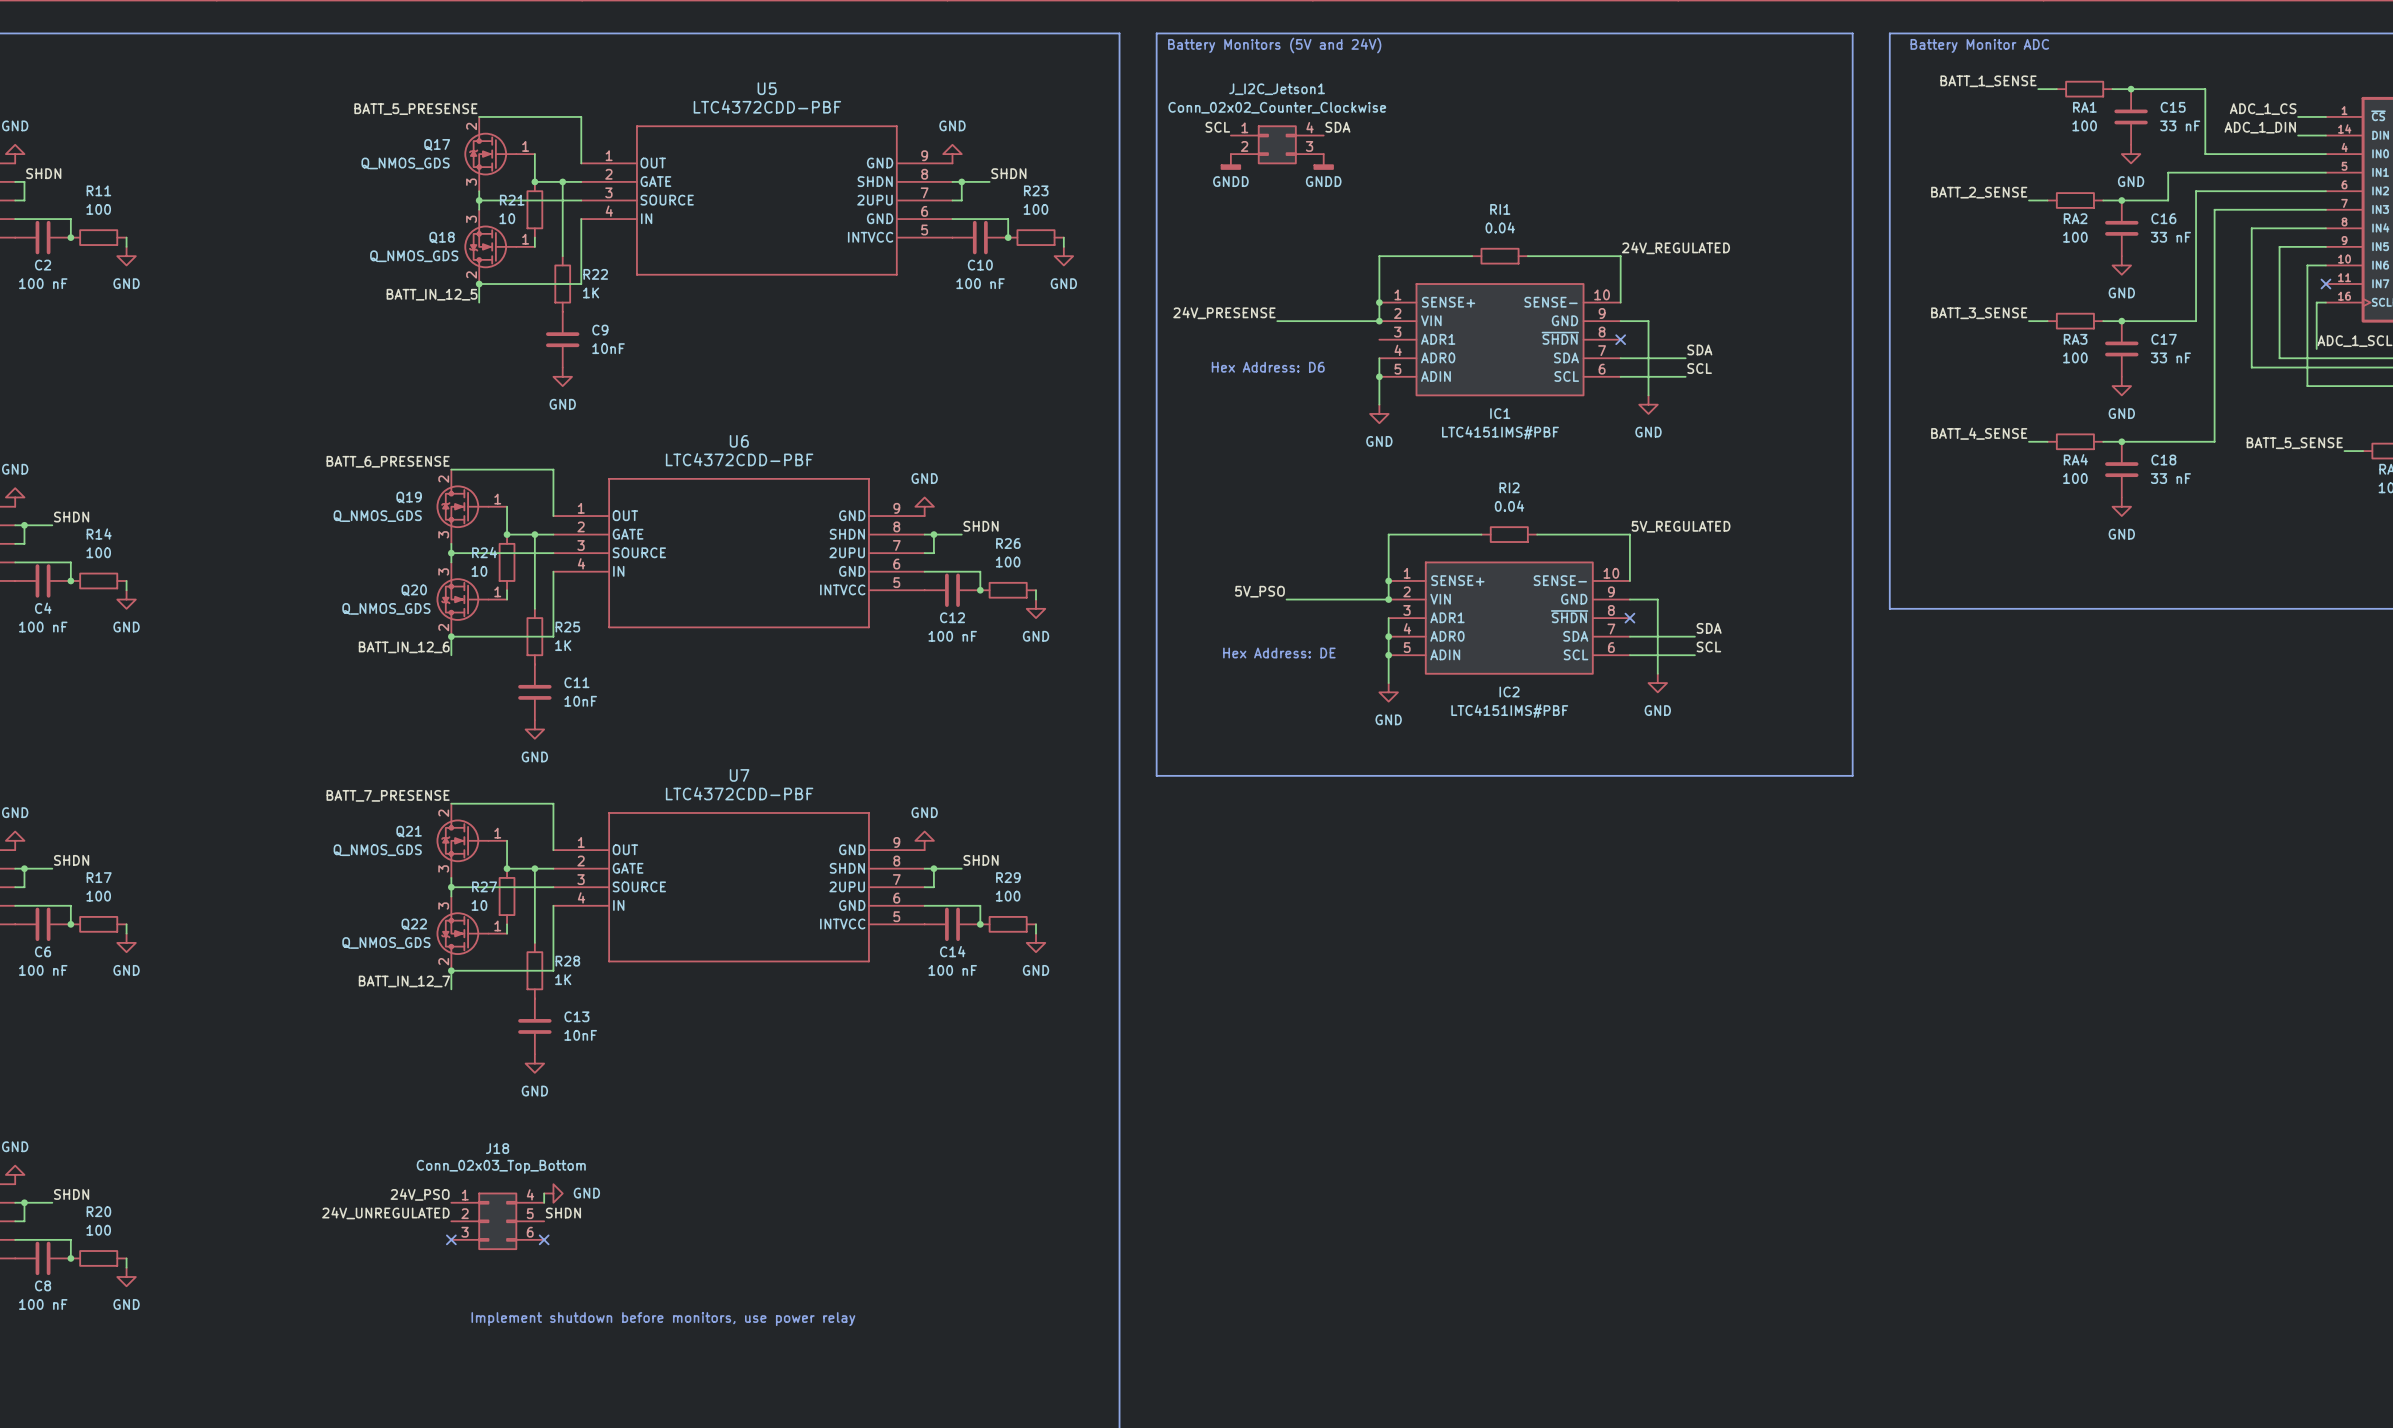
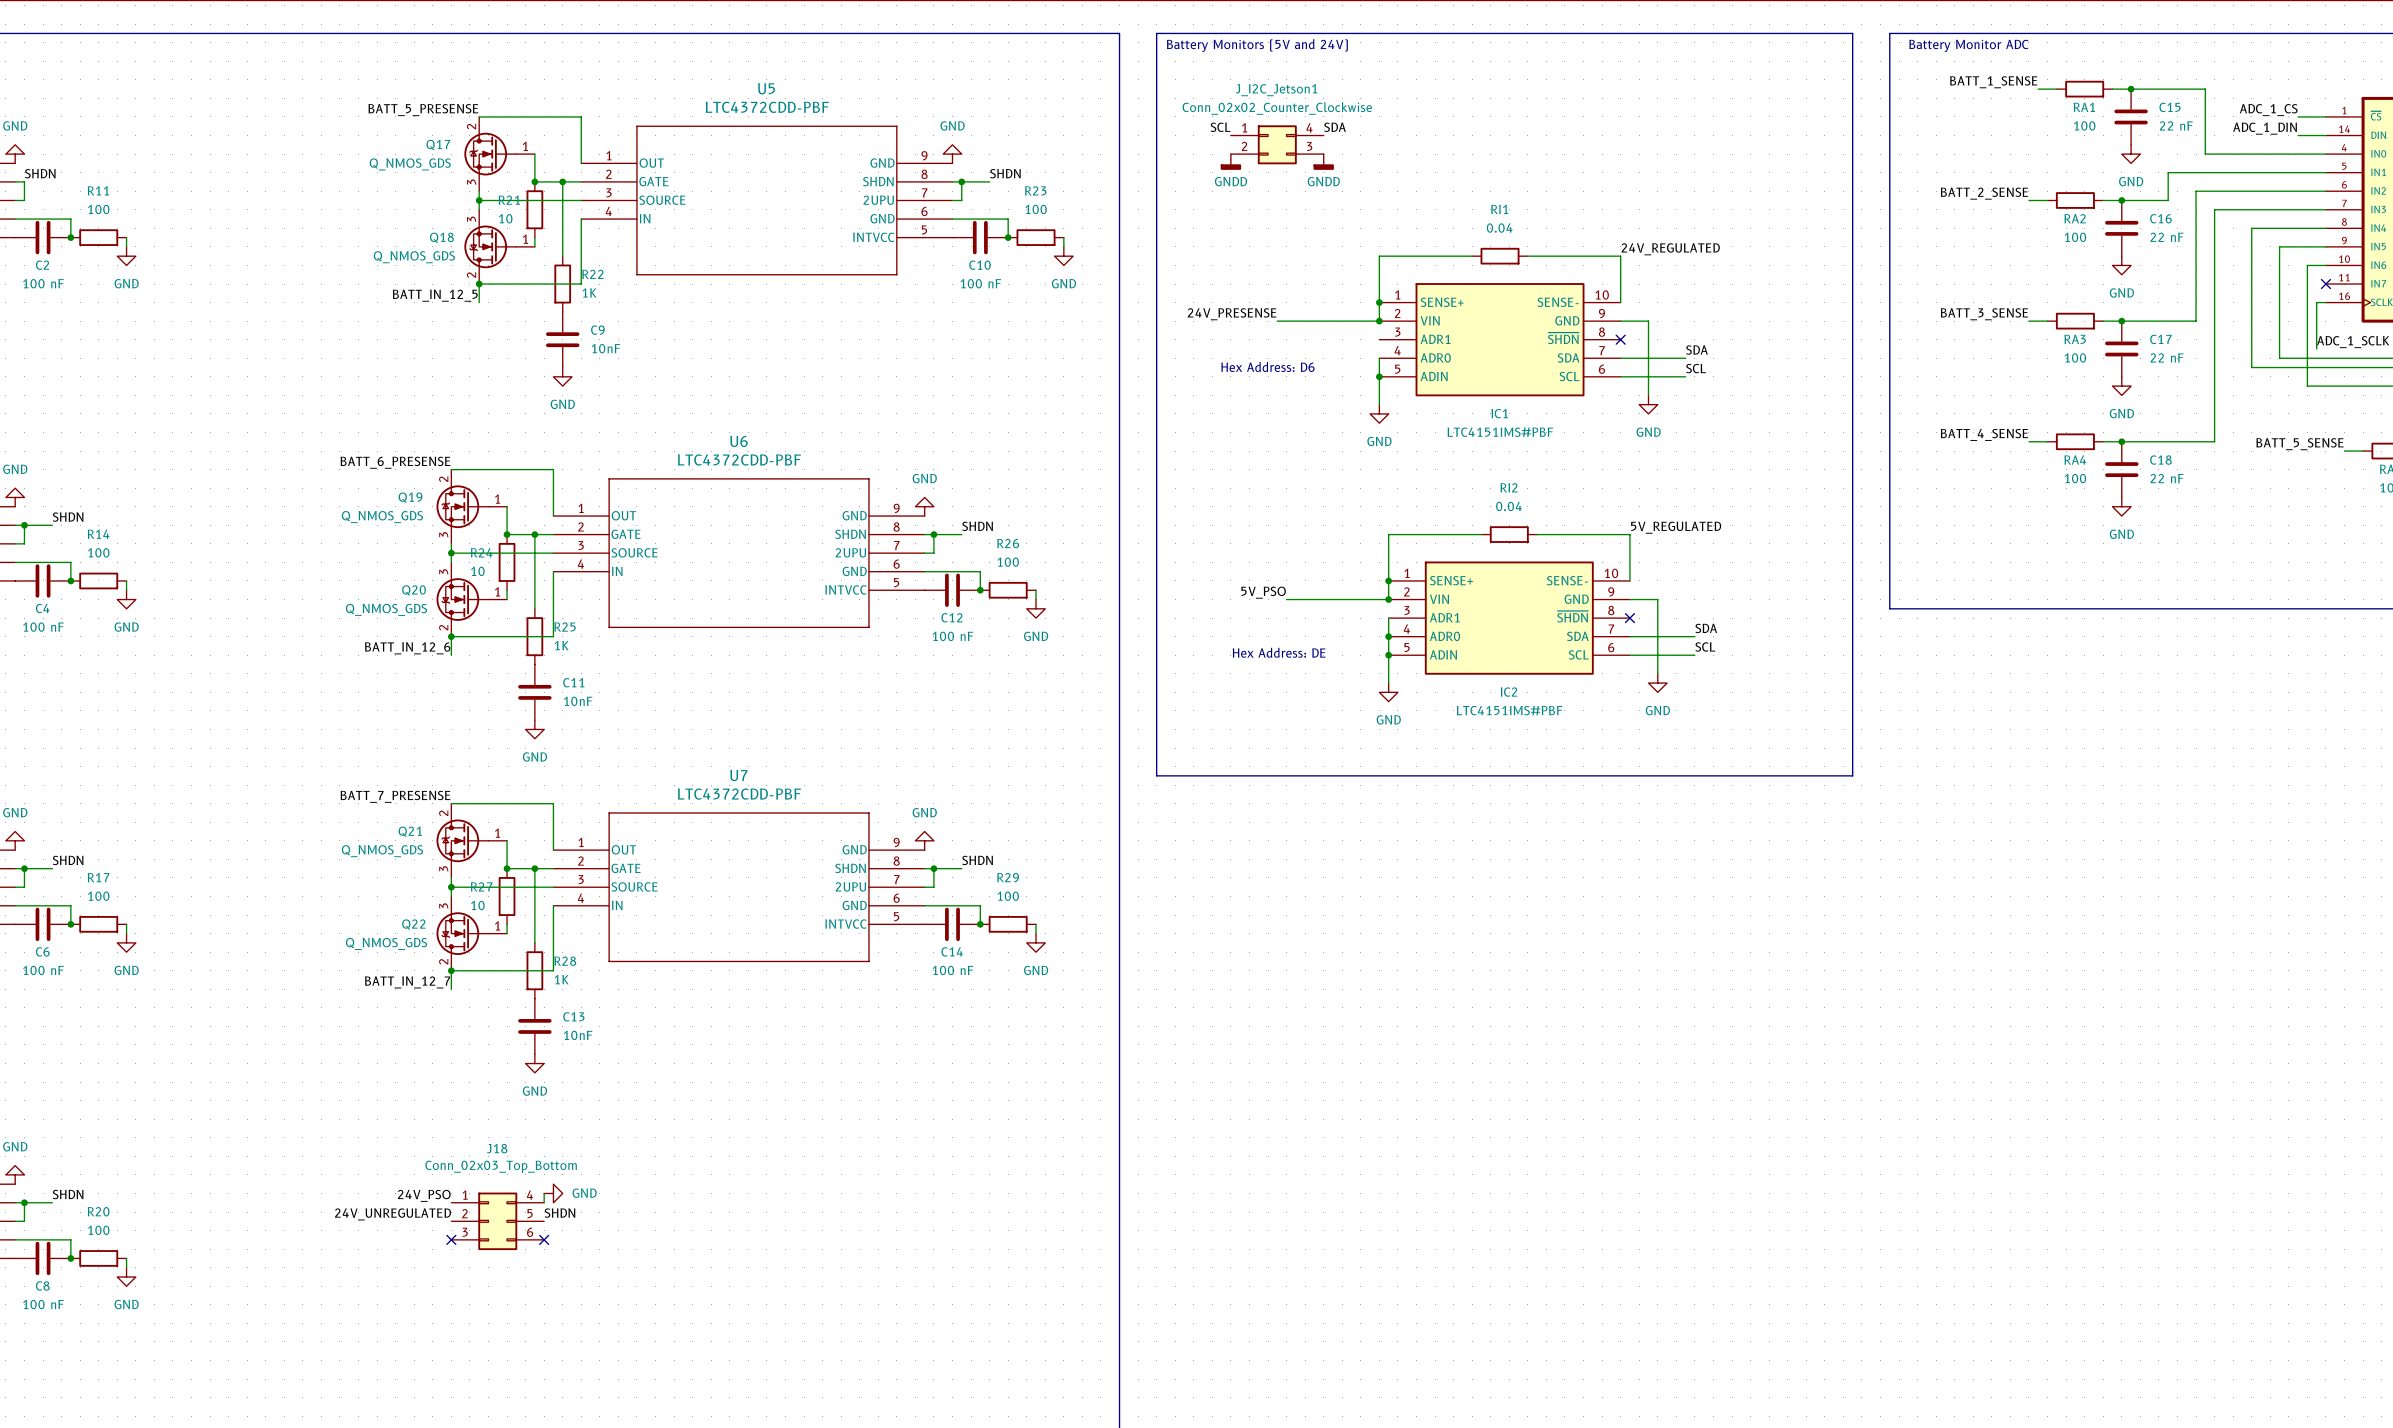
C15 value: 33 nF (2180, 125) -> 22 nF (2176, 125)
C16 value: 33 nF (2170, 237) -> 22 nF (2167, 237)
C17 value: 33 nF (2170, 357) -> 22 nF (2167, 357)
C18 value: 33 nF (2170, 478) -> 22 nF (2167, 478)
text: Implement shutdown before monitors, use power relay (663, 1319) -> none

